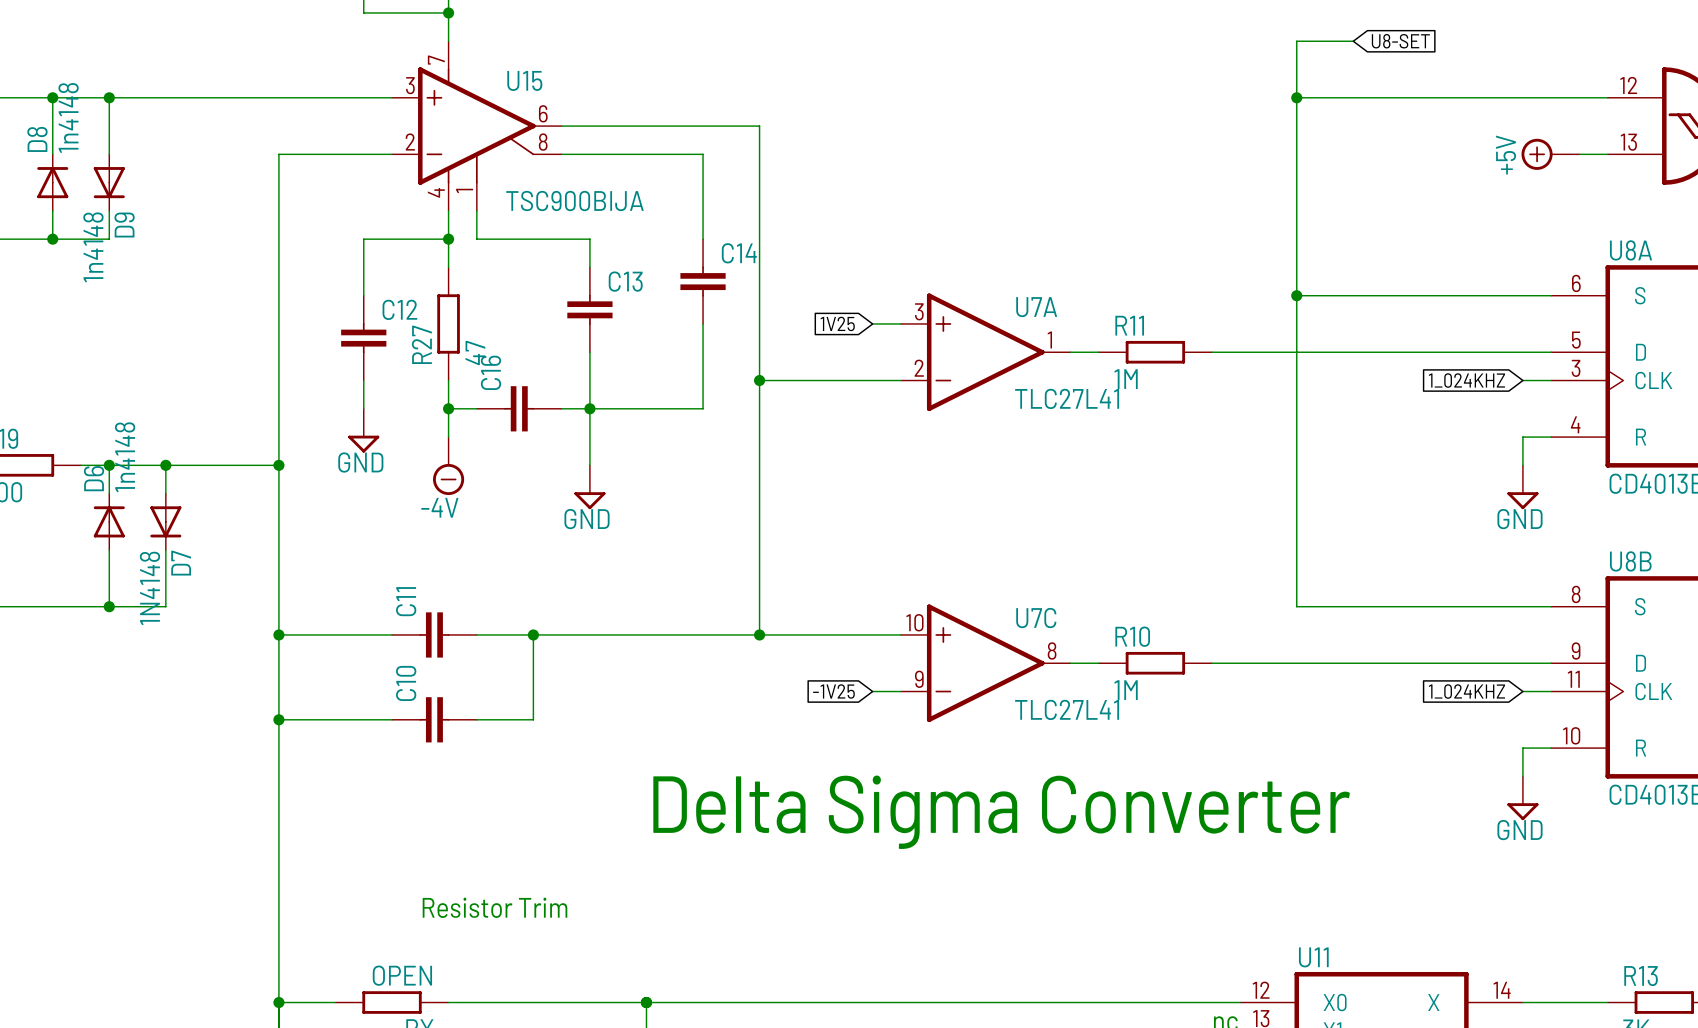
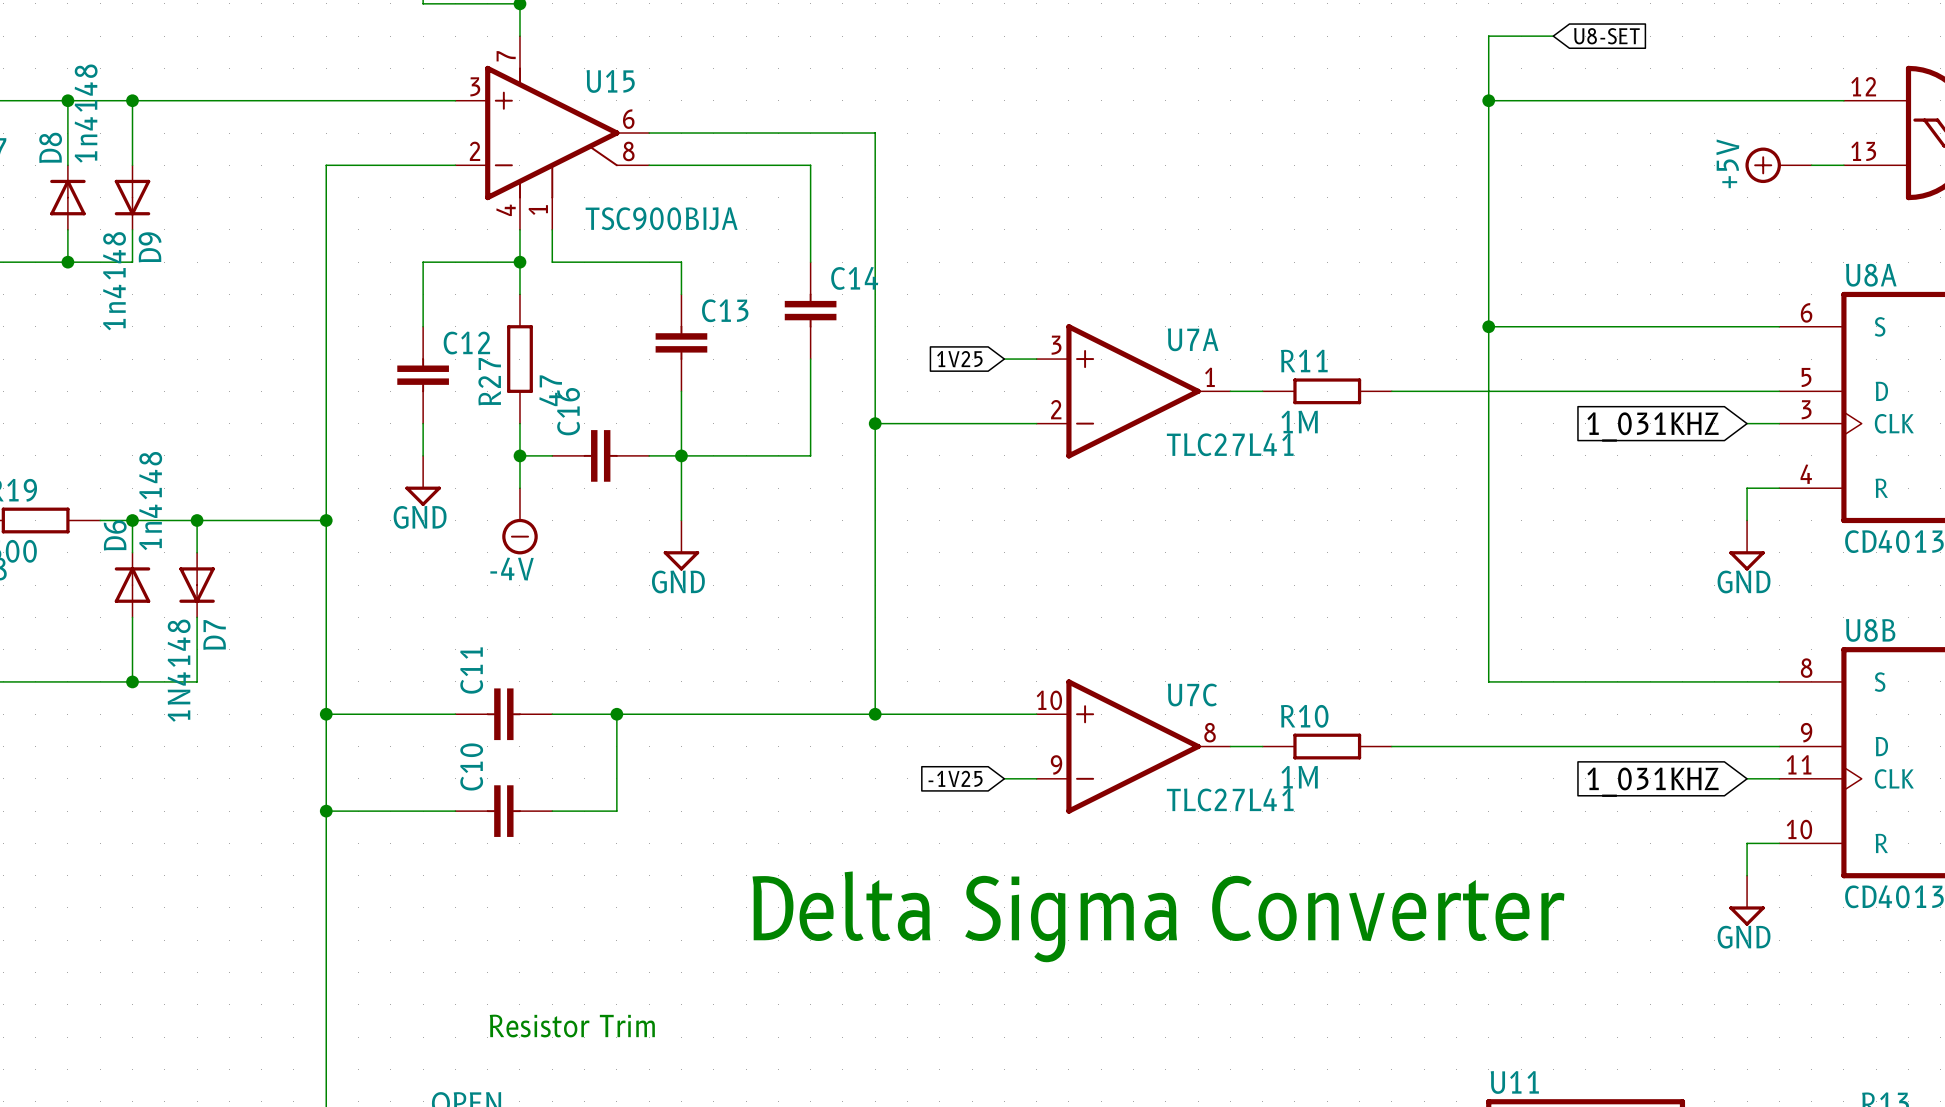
global label: 1_024KHZ (1466, 380) -> 1_031KHZ (1653, 427)
global label: 1_024KHZ (1466, 691) -> 1_031KHZ (1653, 782)

